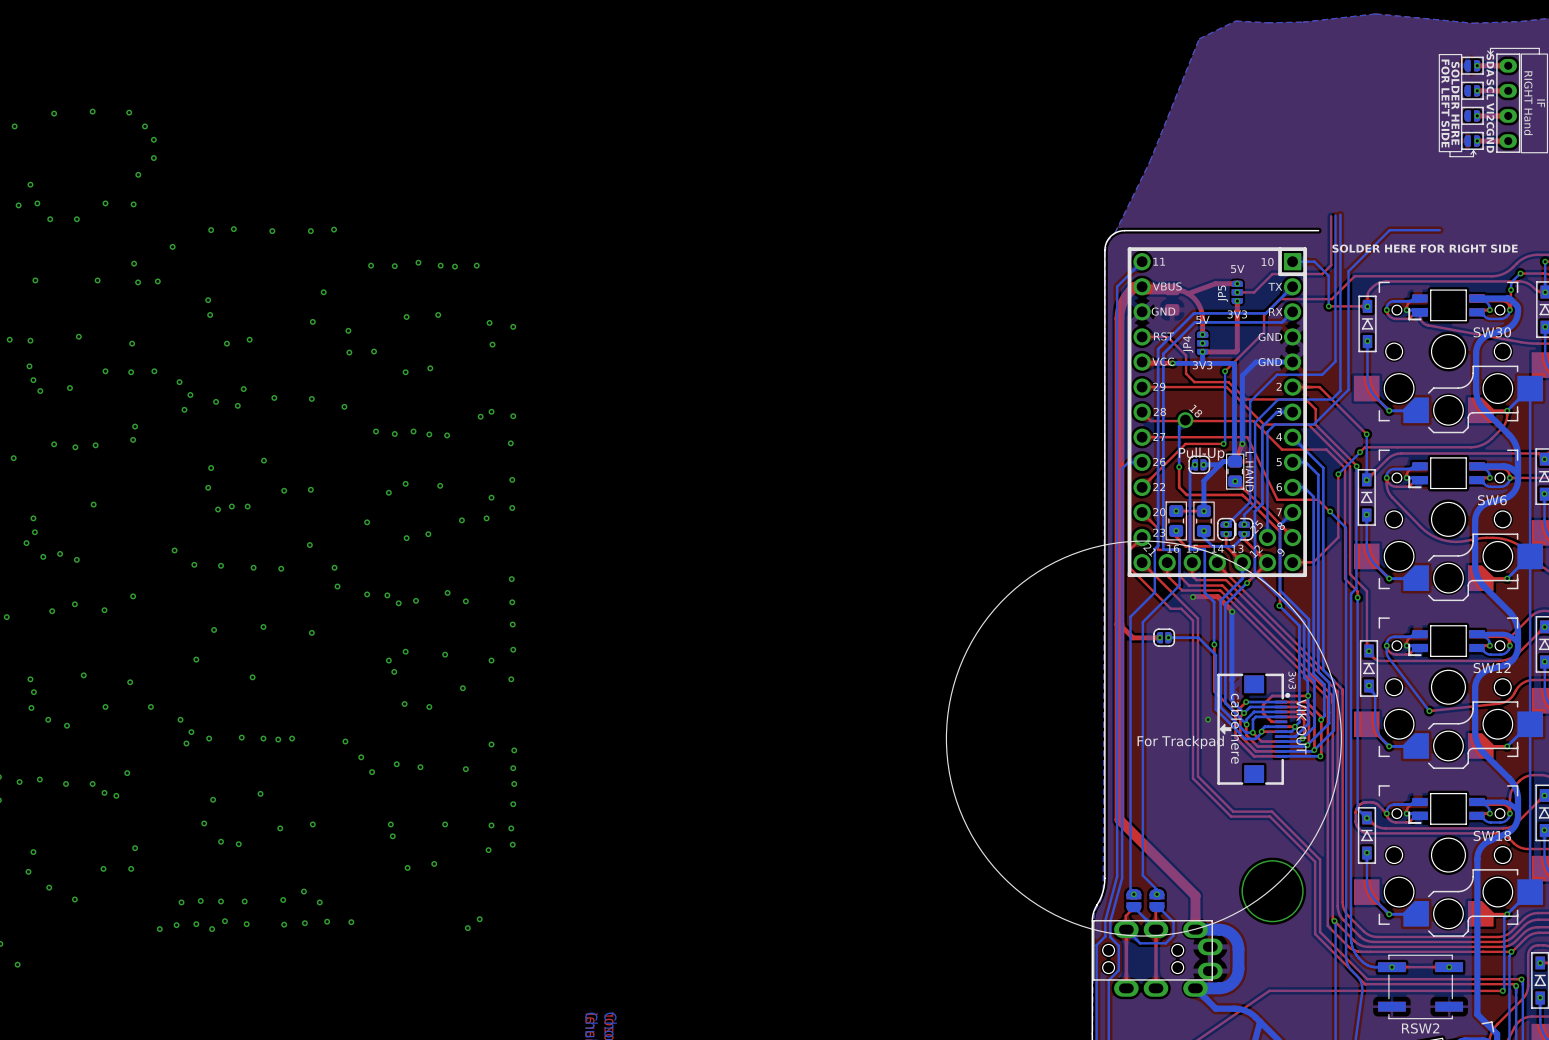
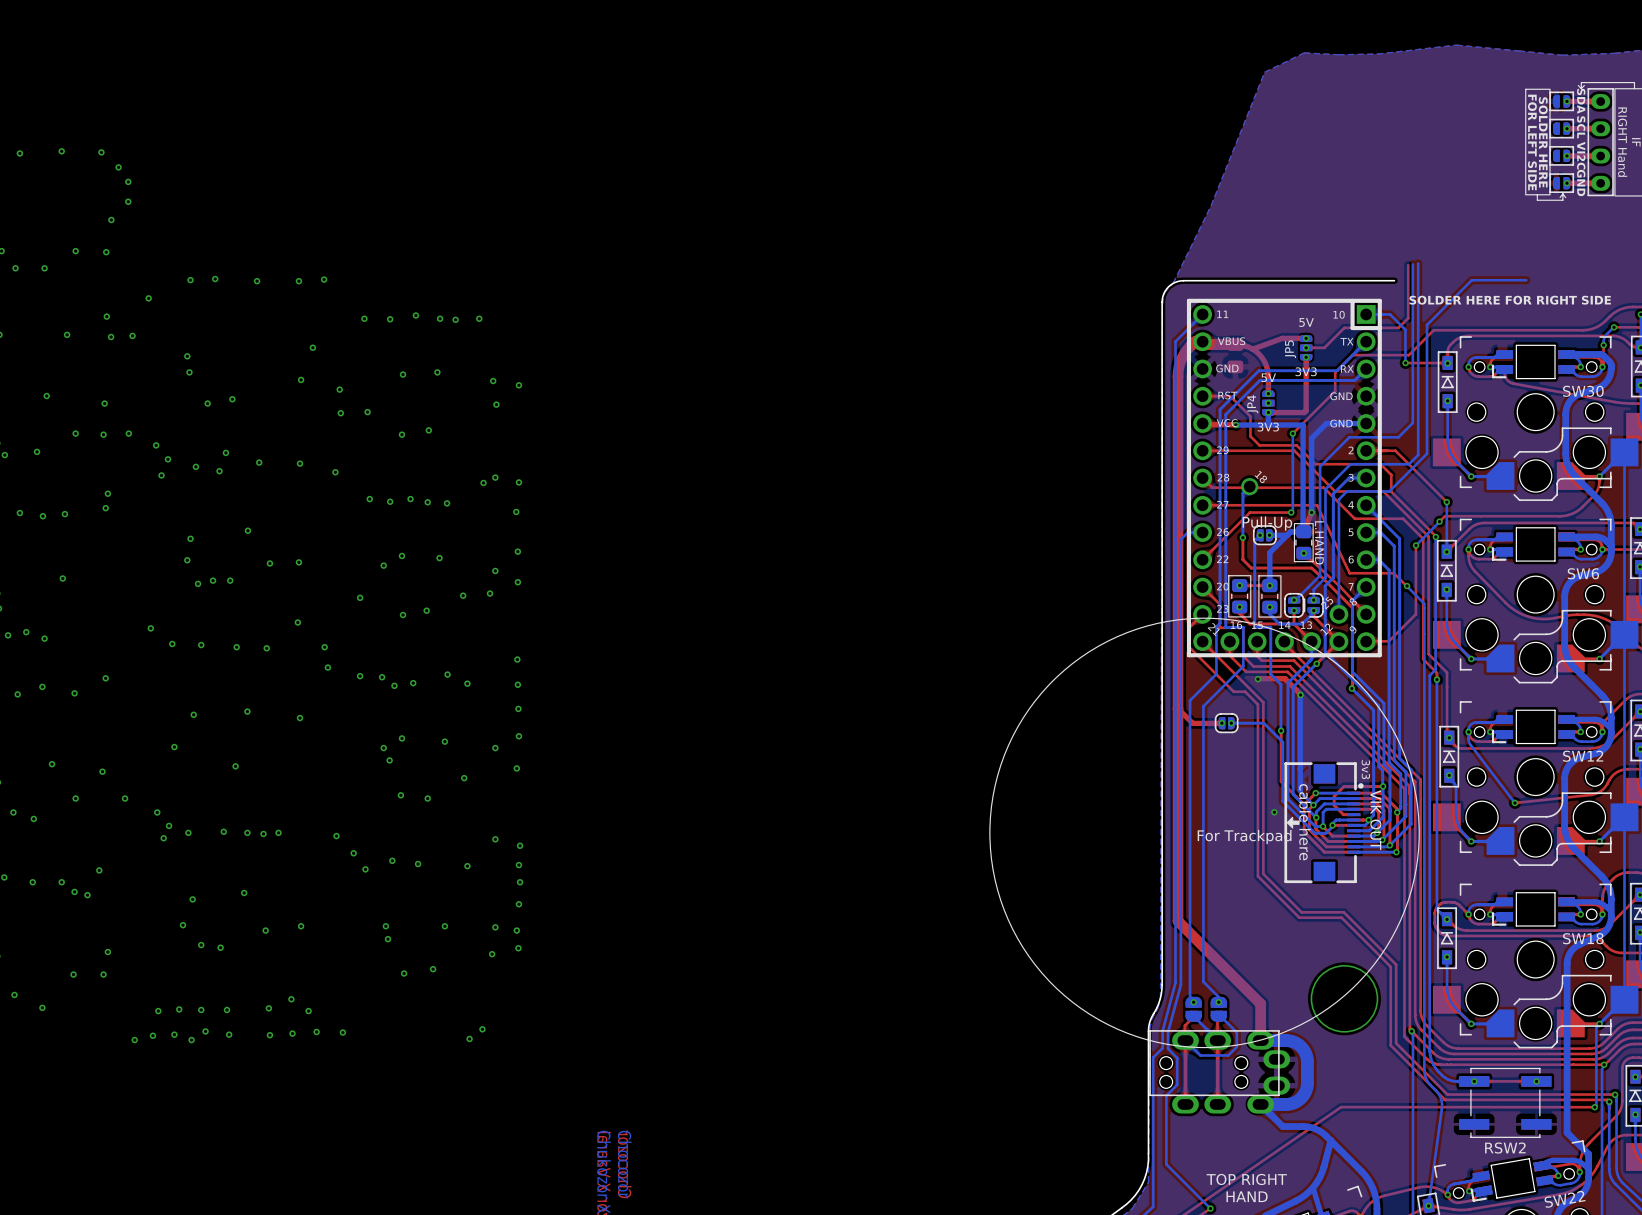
part footprint: [1127, 247, 1307, 578] -> [1186, 298, 1382, 658]

